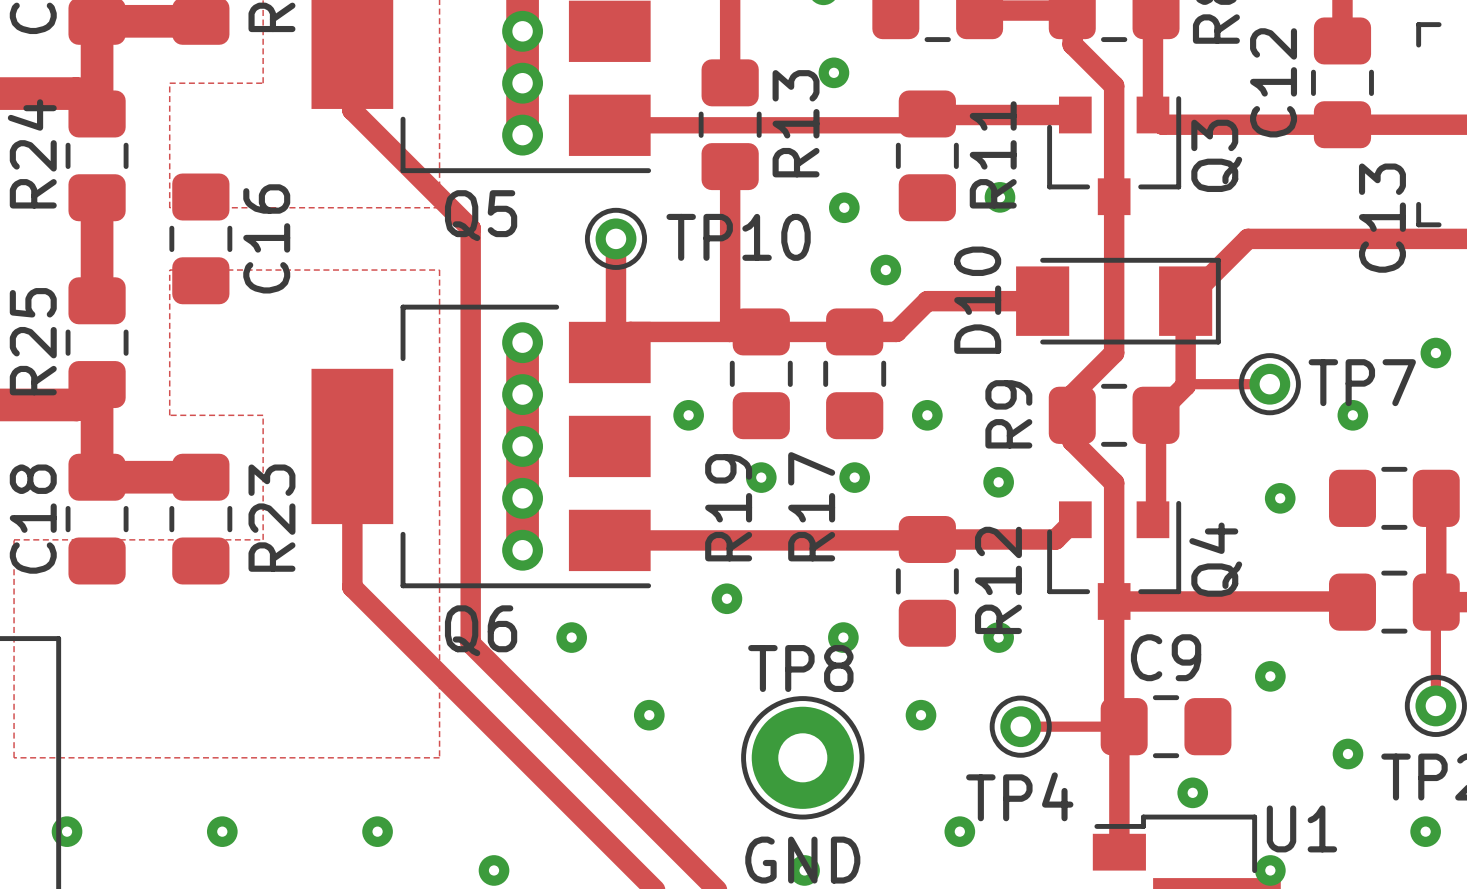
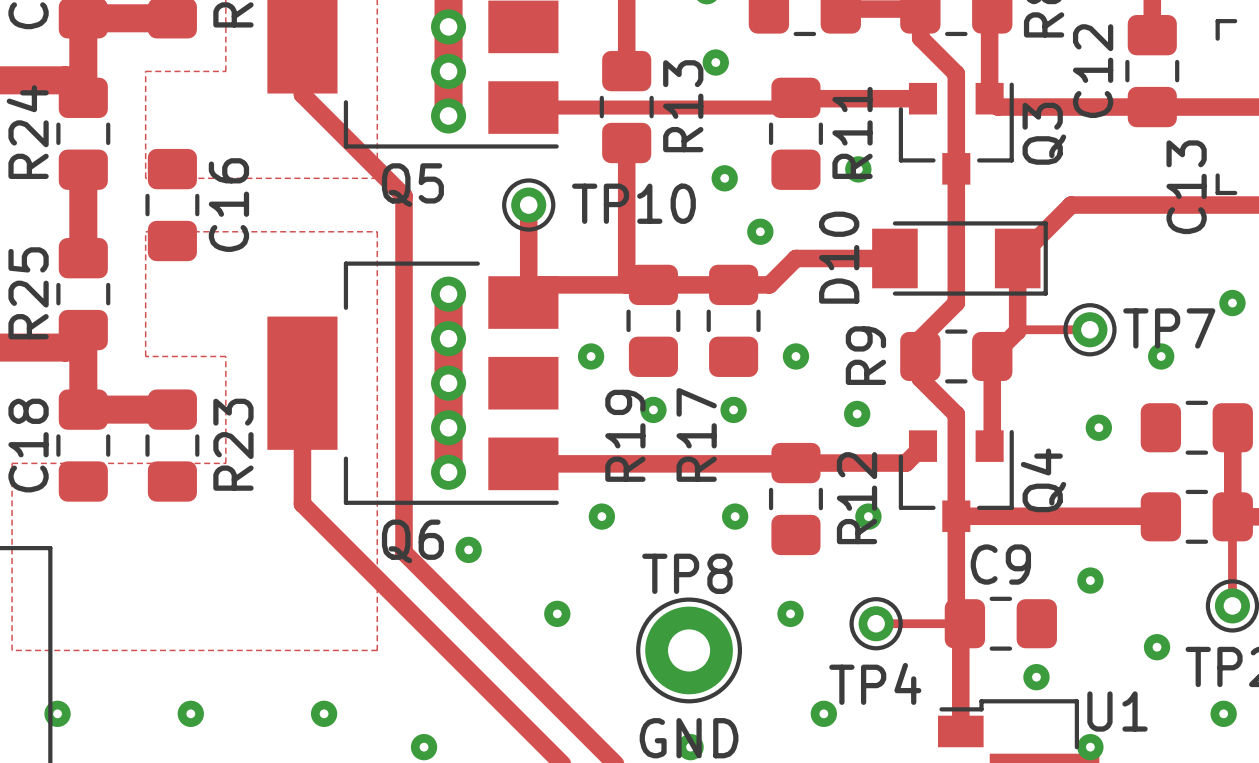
via position: (726, 598) -> (601, 516)
via position: (571, 637) -> (468, 549)
via position: (843, 637) -> (735, 516)
via position: (998, 637) -> (868, 516)
via position: (1192, 792) -> (1036, 677)

